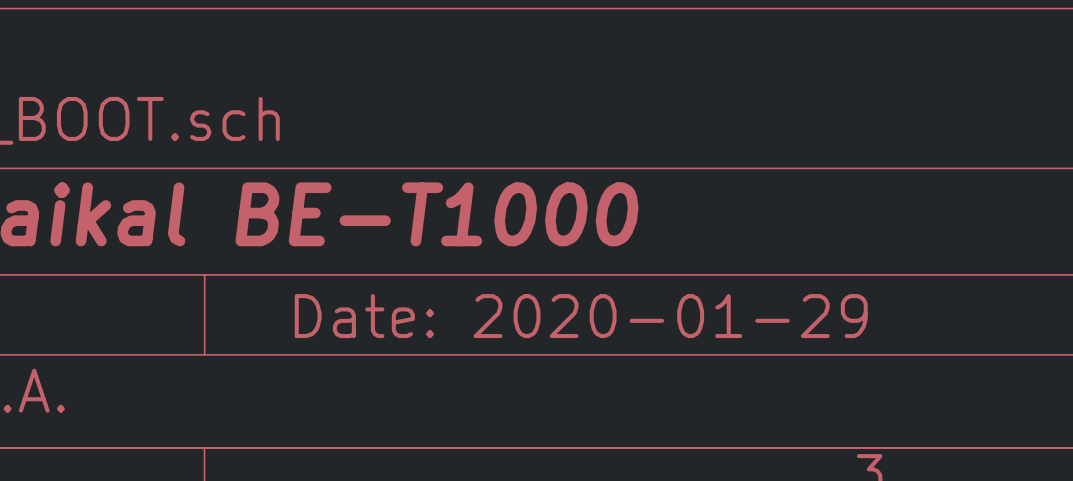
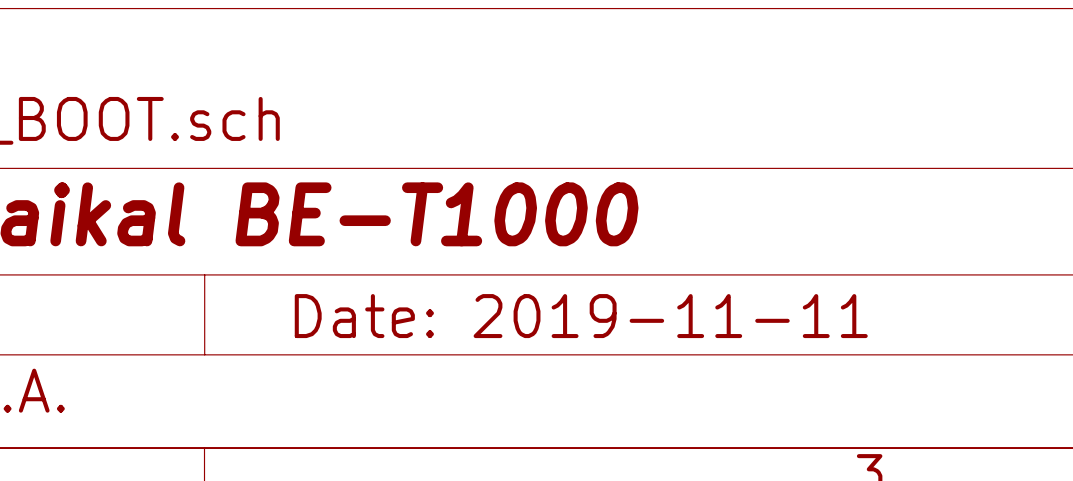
title block: Date: 2020-01-29 (581, 316) -> Date: 2019-11-11 (581, 316)

